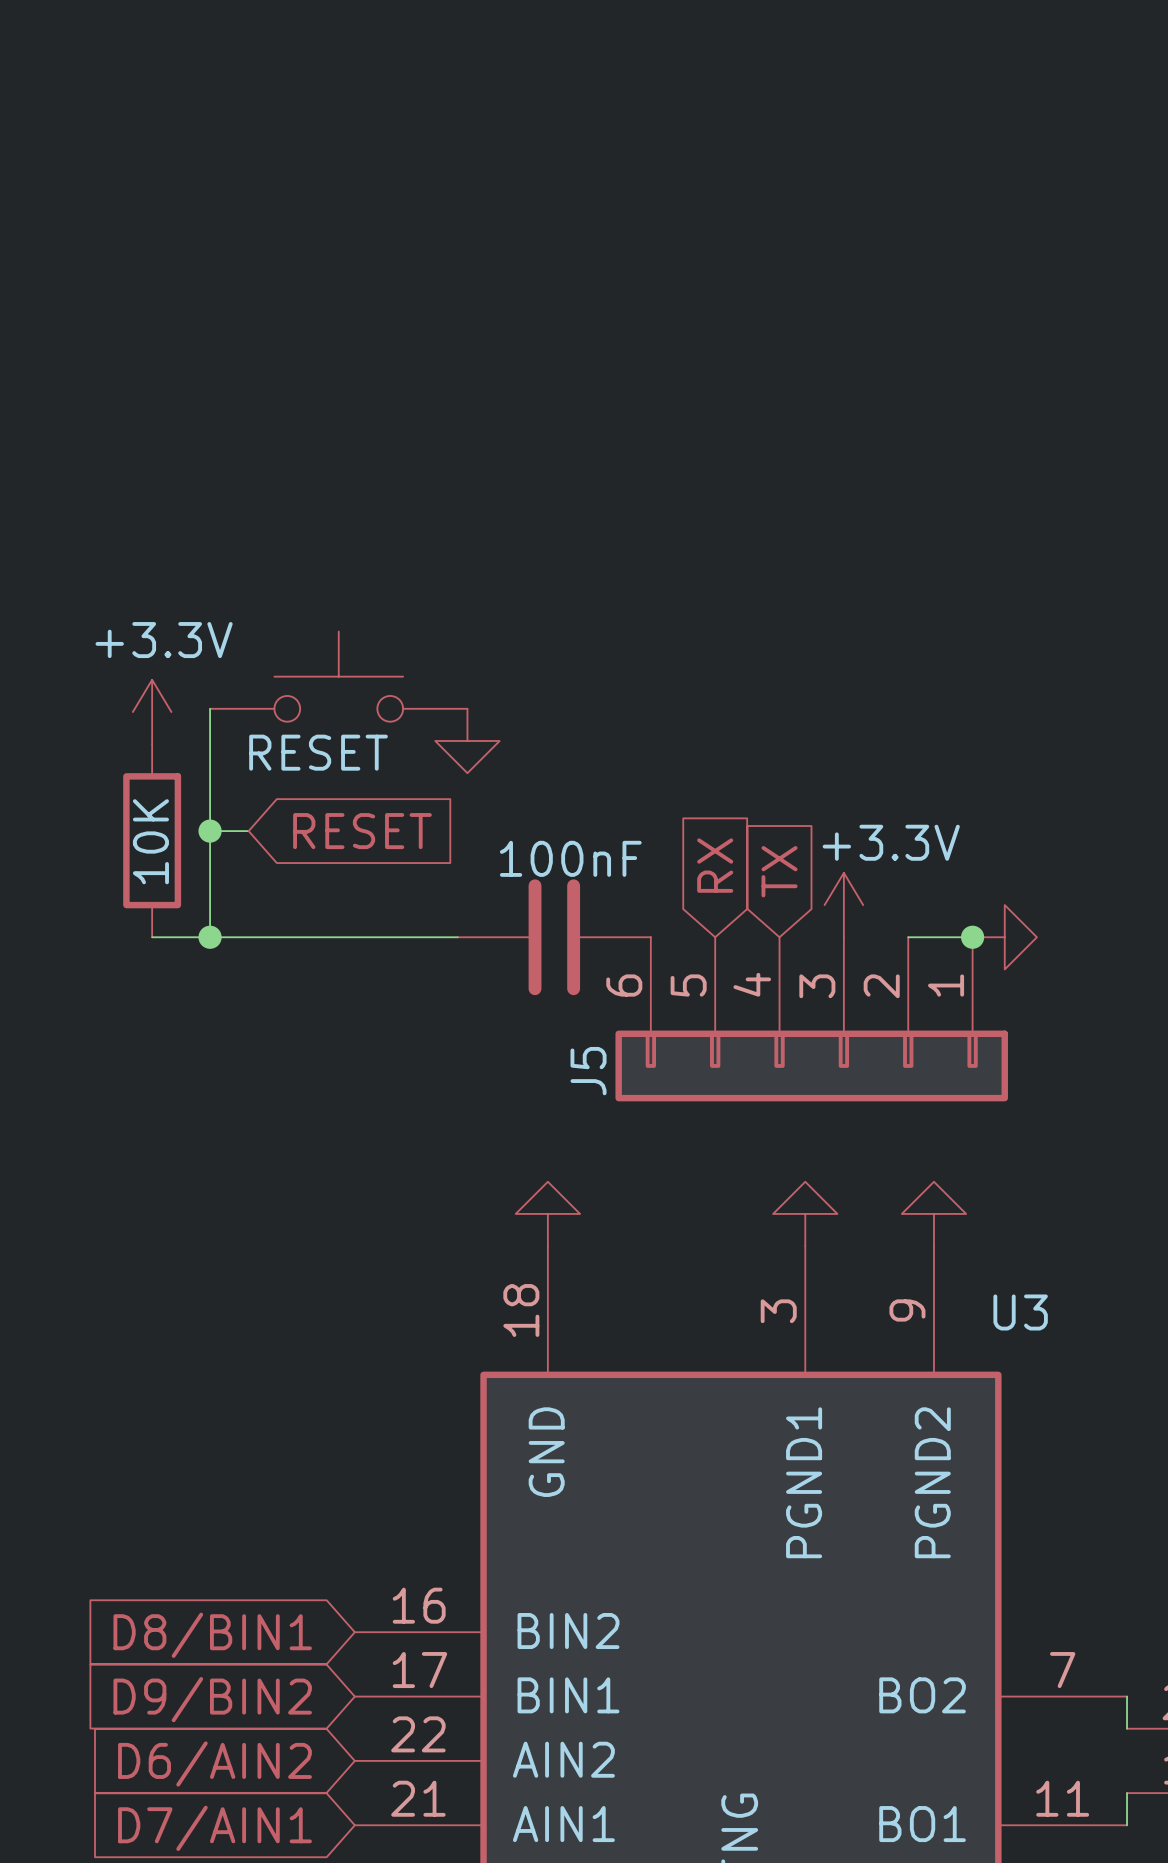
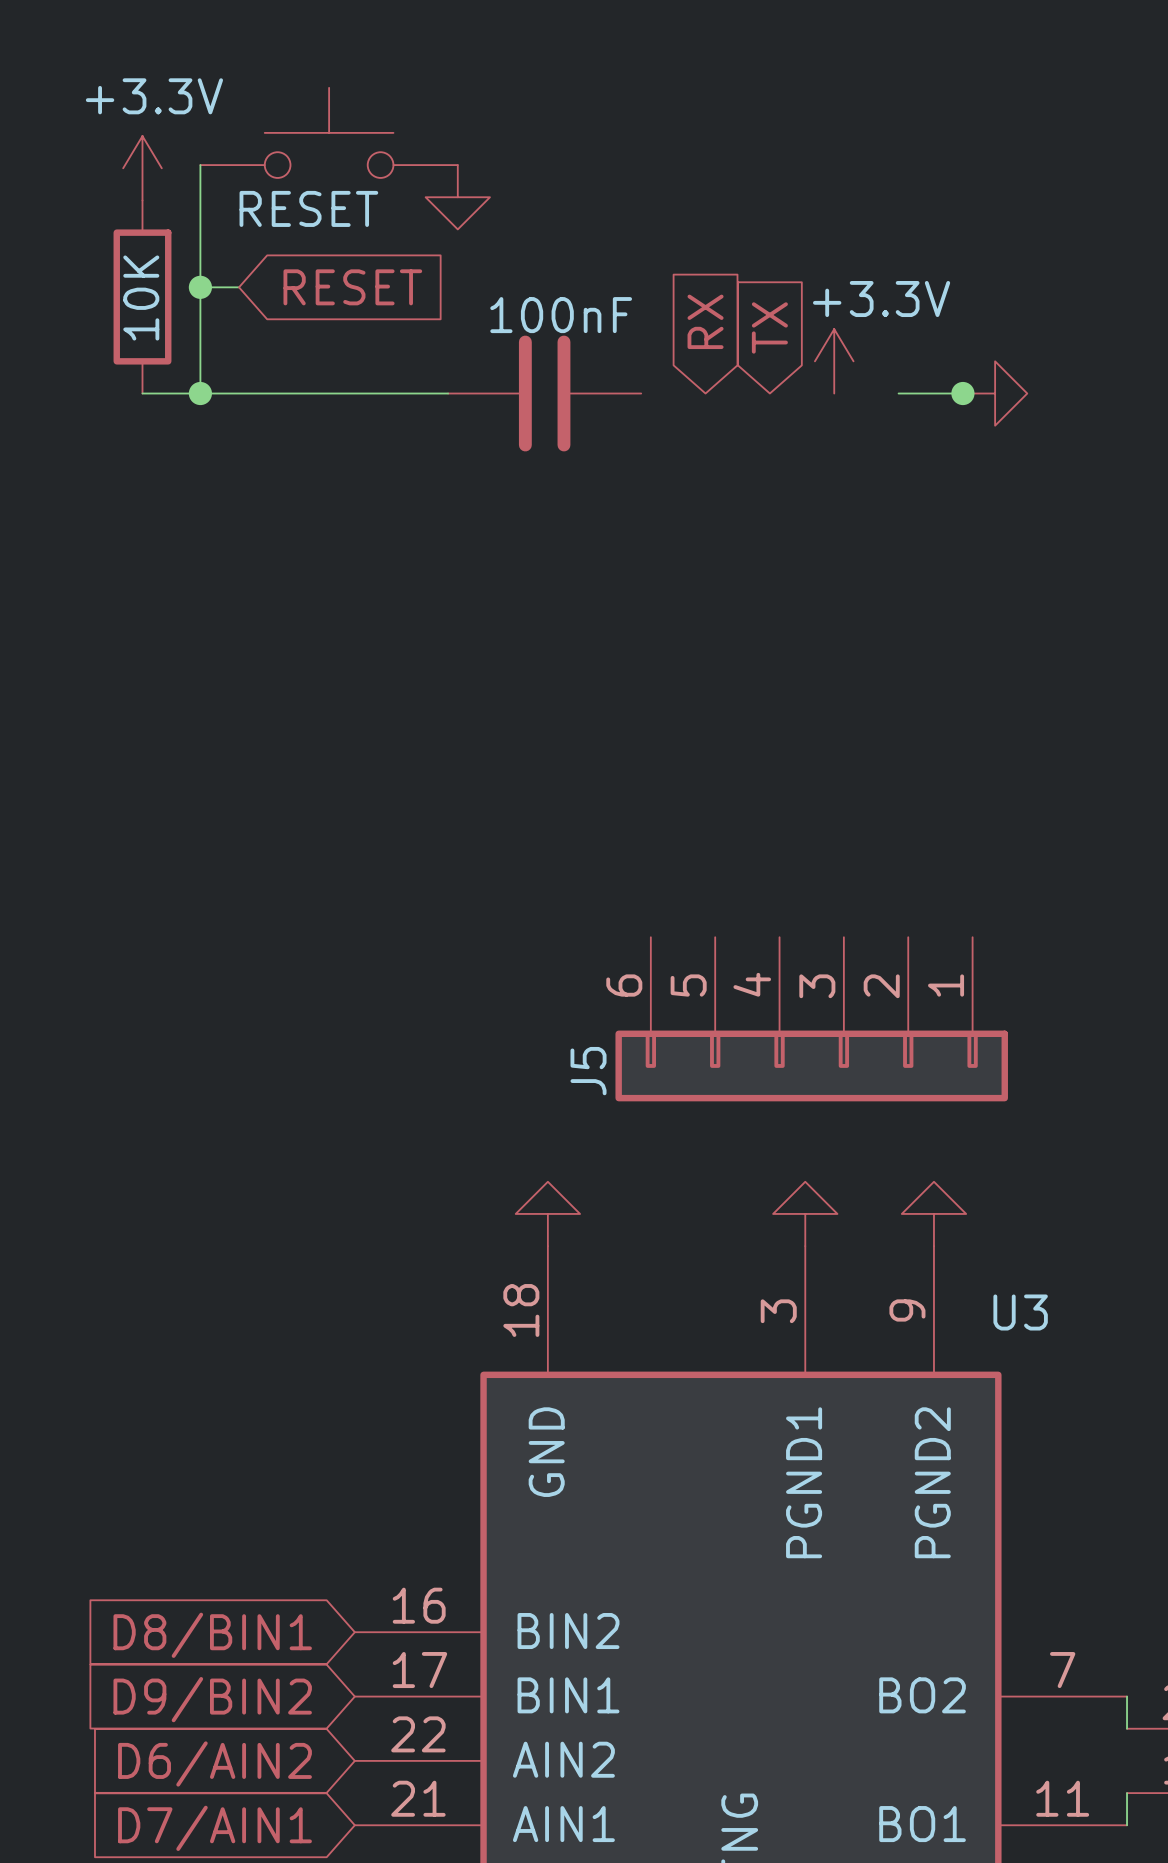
power symbol: none -> +3.3V (142, 168)
power symbol: none -> (457, 197)
junction: none -> (200, 287)
power symbol: none -> +3.3V (834, 361)
junction: none -> (200, 393)
junction: none -> (962, 393)
power symbol: none -> (995, 393)
part position: (338, 676) -> (329, 132)
wire: (210, 708) (210, 937) -> (200, 165) (200, 393)
power symbol: +3.3V (152, 712) -> none
power symbol: (467, 740) -> none
wire: (210, 831) (248, 831) -> (200, 287) (239, 287)
junction: (210, 831) -> none
global label position: RESET (362, 831) -> RESET (352, 287)
part position: (152, 840) -> (142, 296)
global label position: RX (715, 865) -> RX (705, 321)
global label position: TX (779, 871) -> TX (769, 327)
power symbol: +3.3V (843, 905) -> none
wire: (152, 937) (457, 937) -> (142, 393) (448, 393)
junction: (210, 937) -> none
part position: (554, 937) -> (544, 393)
wire: (908, 937) (972, 937) -> (898, 393) (962, 393)
junction: (972, 937) -> none
power symbol: (1004, 937) -> none

